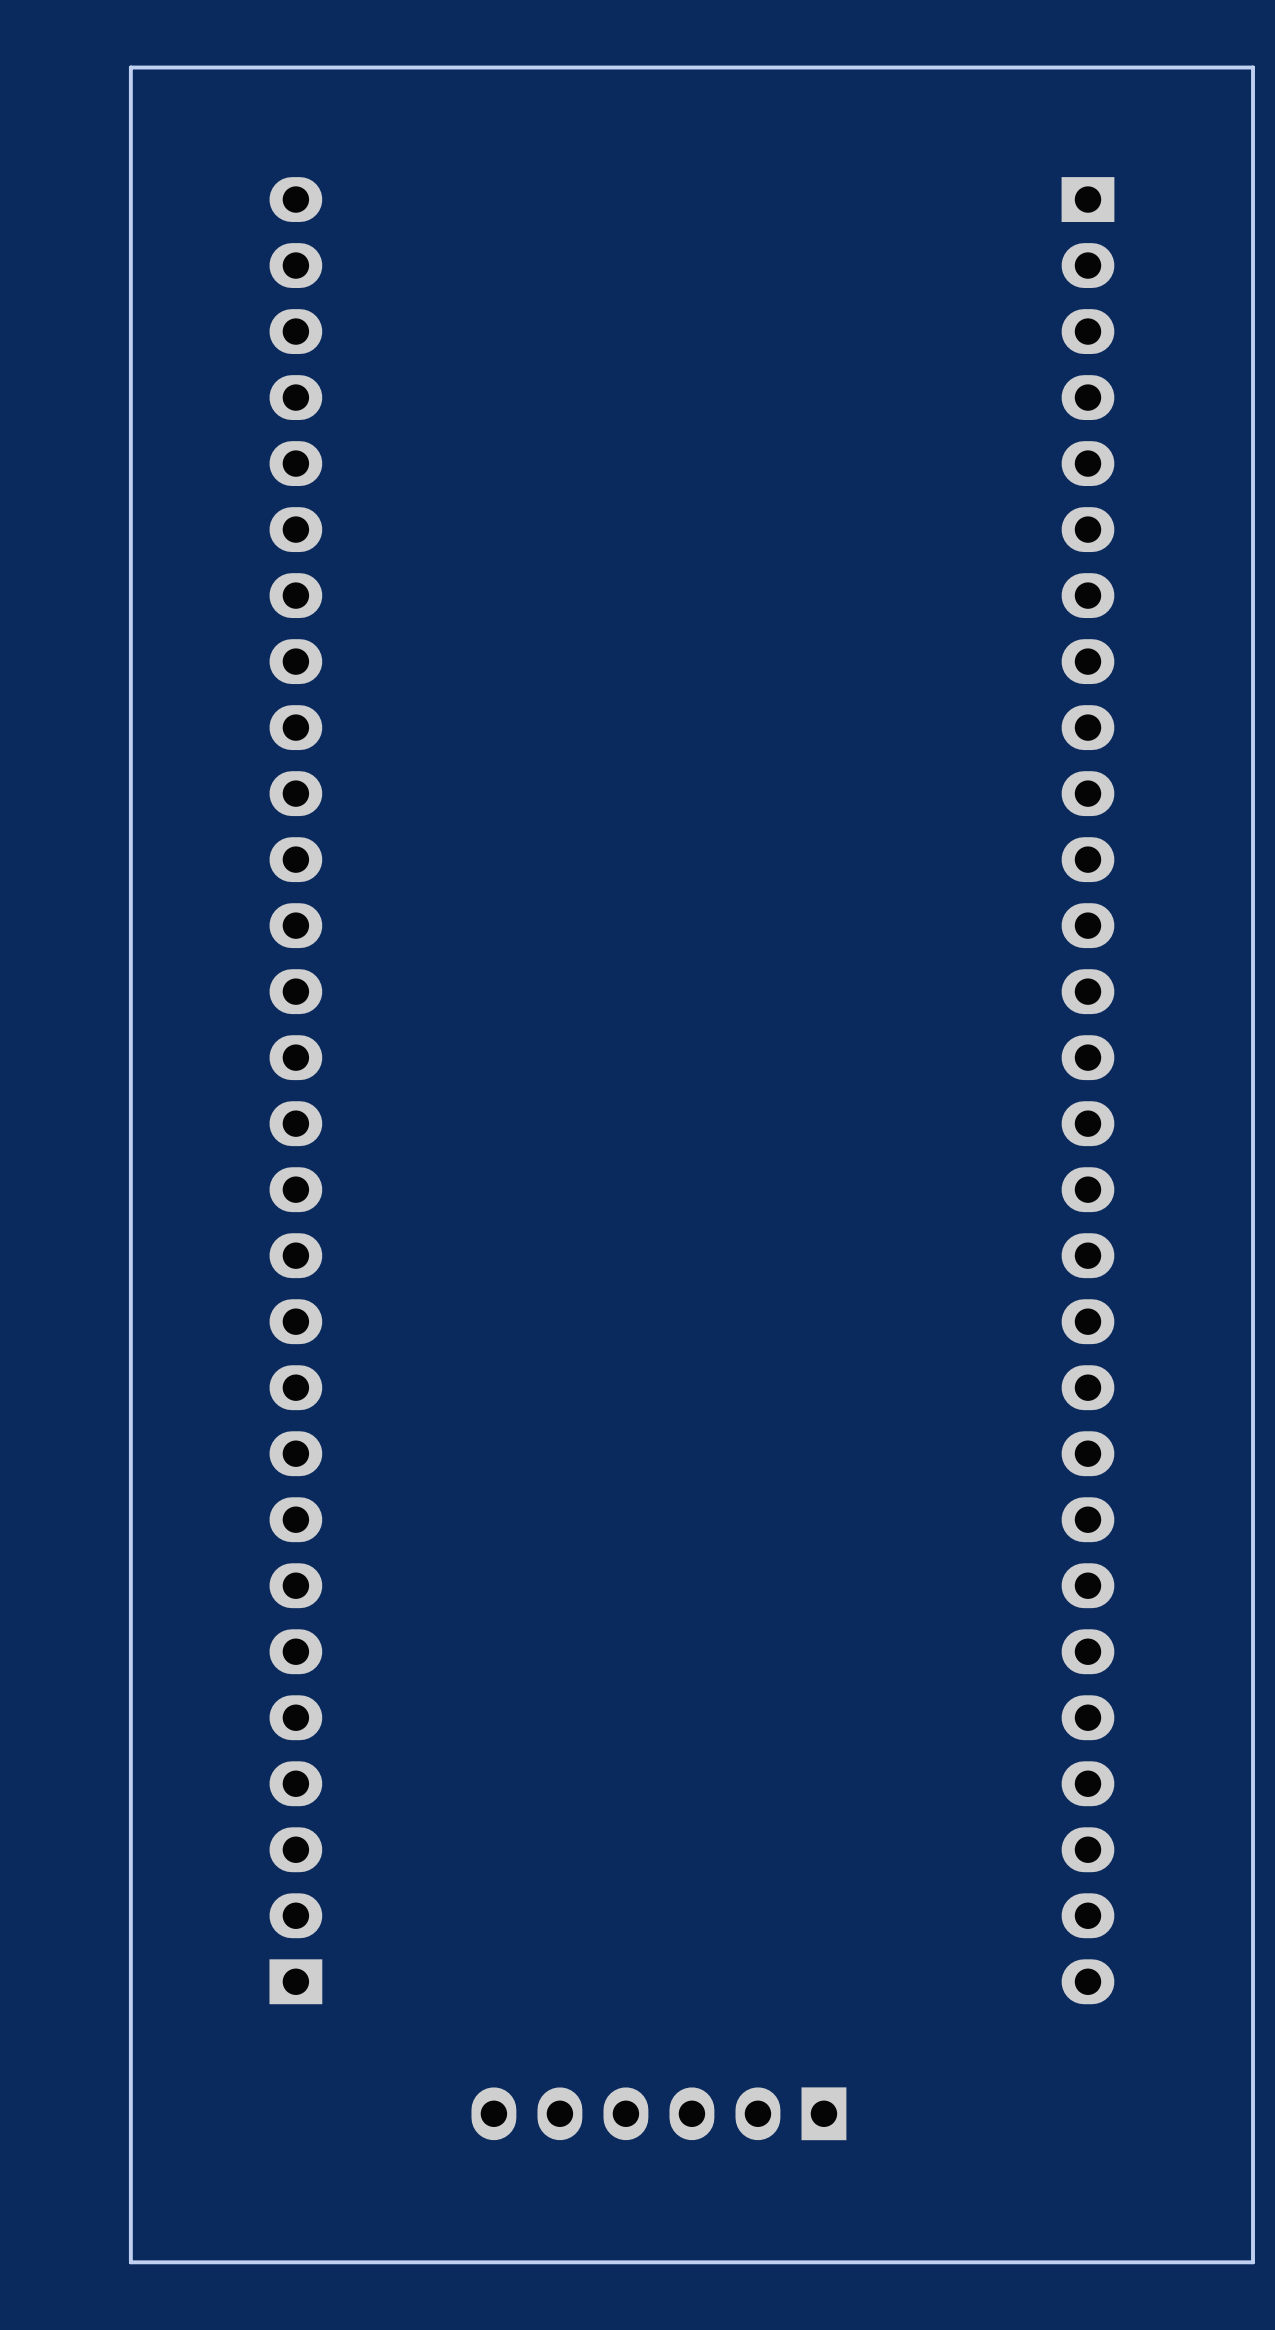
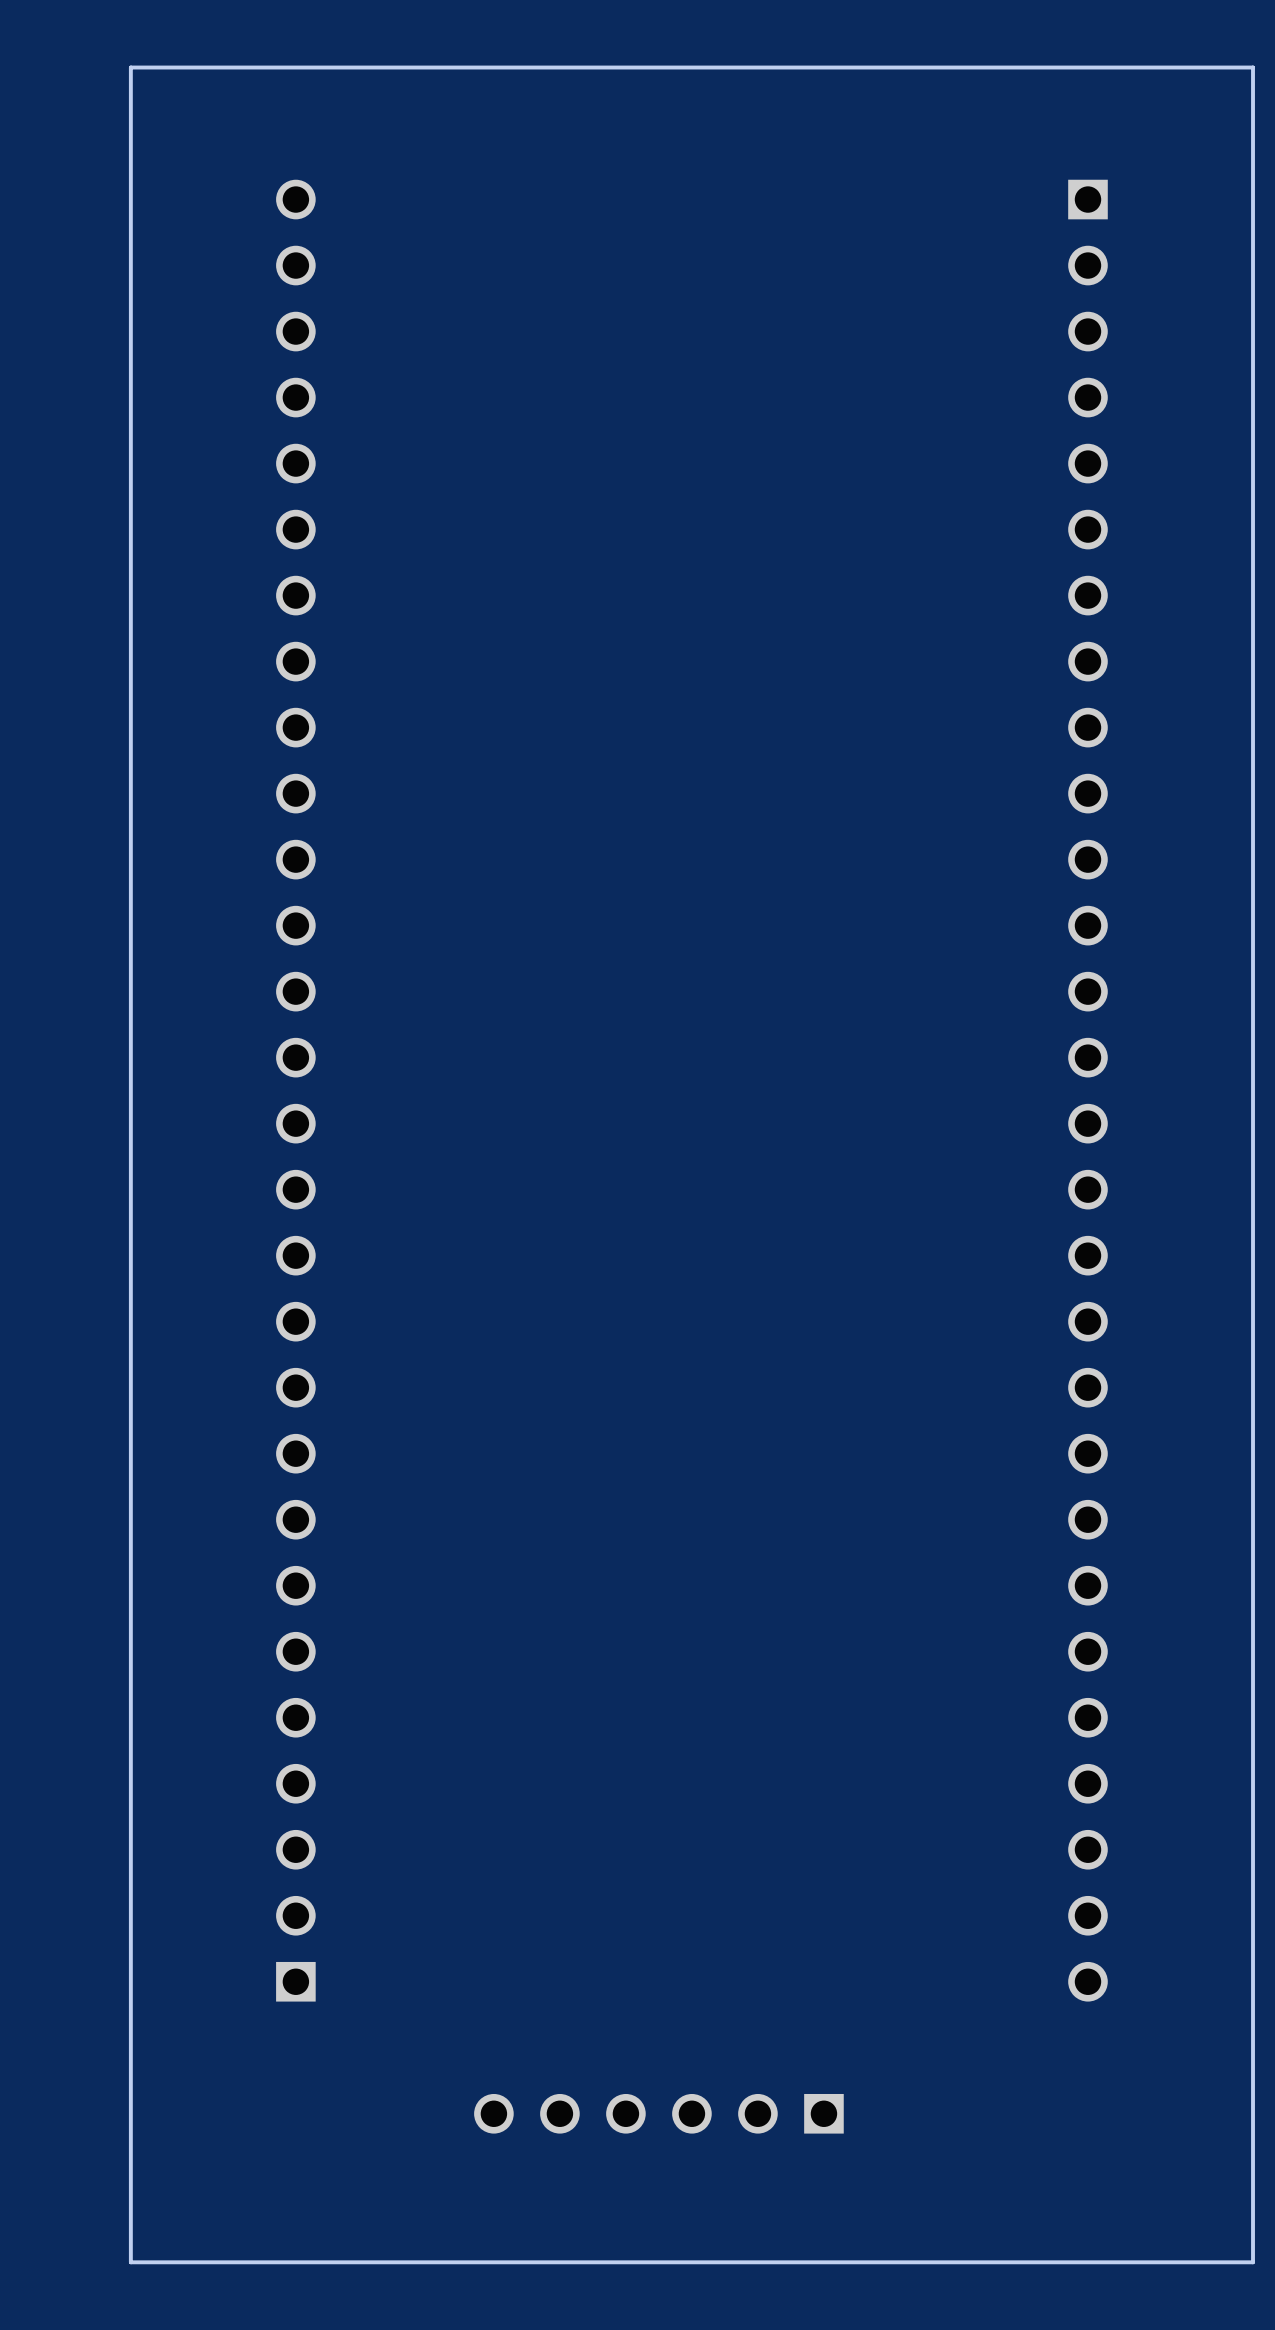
part footprint: [269, 177, 323, 2005] -> [276, 179, 316, 2002]
part footprint: [1061, 177, 1115, 2005] -> [1068, 179, 1108, 2002]
part footprint: [471, 2087, 847, 2141] -> [474, 2093, 844, 2134]

